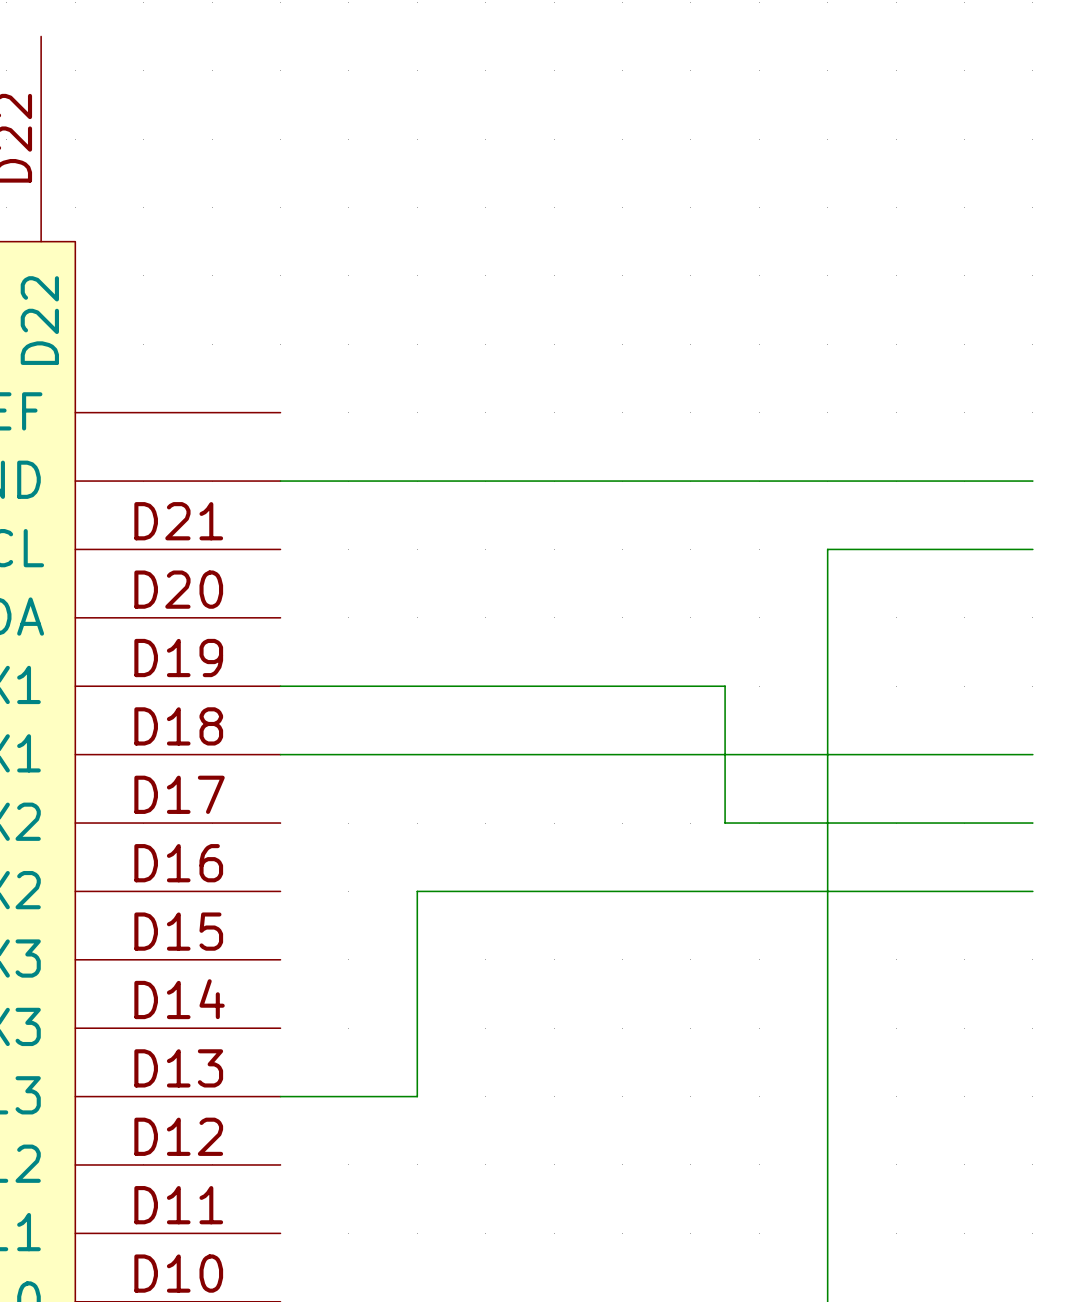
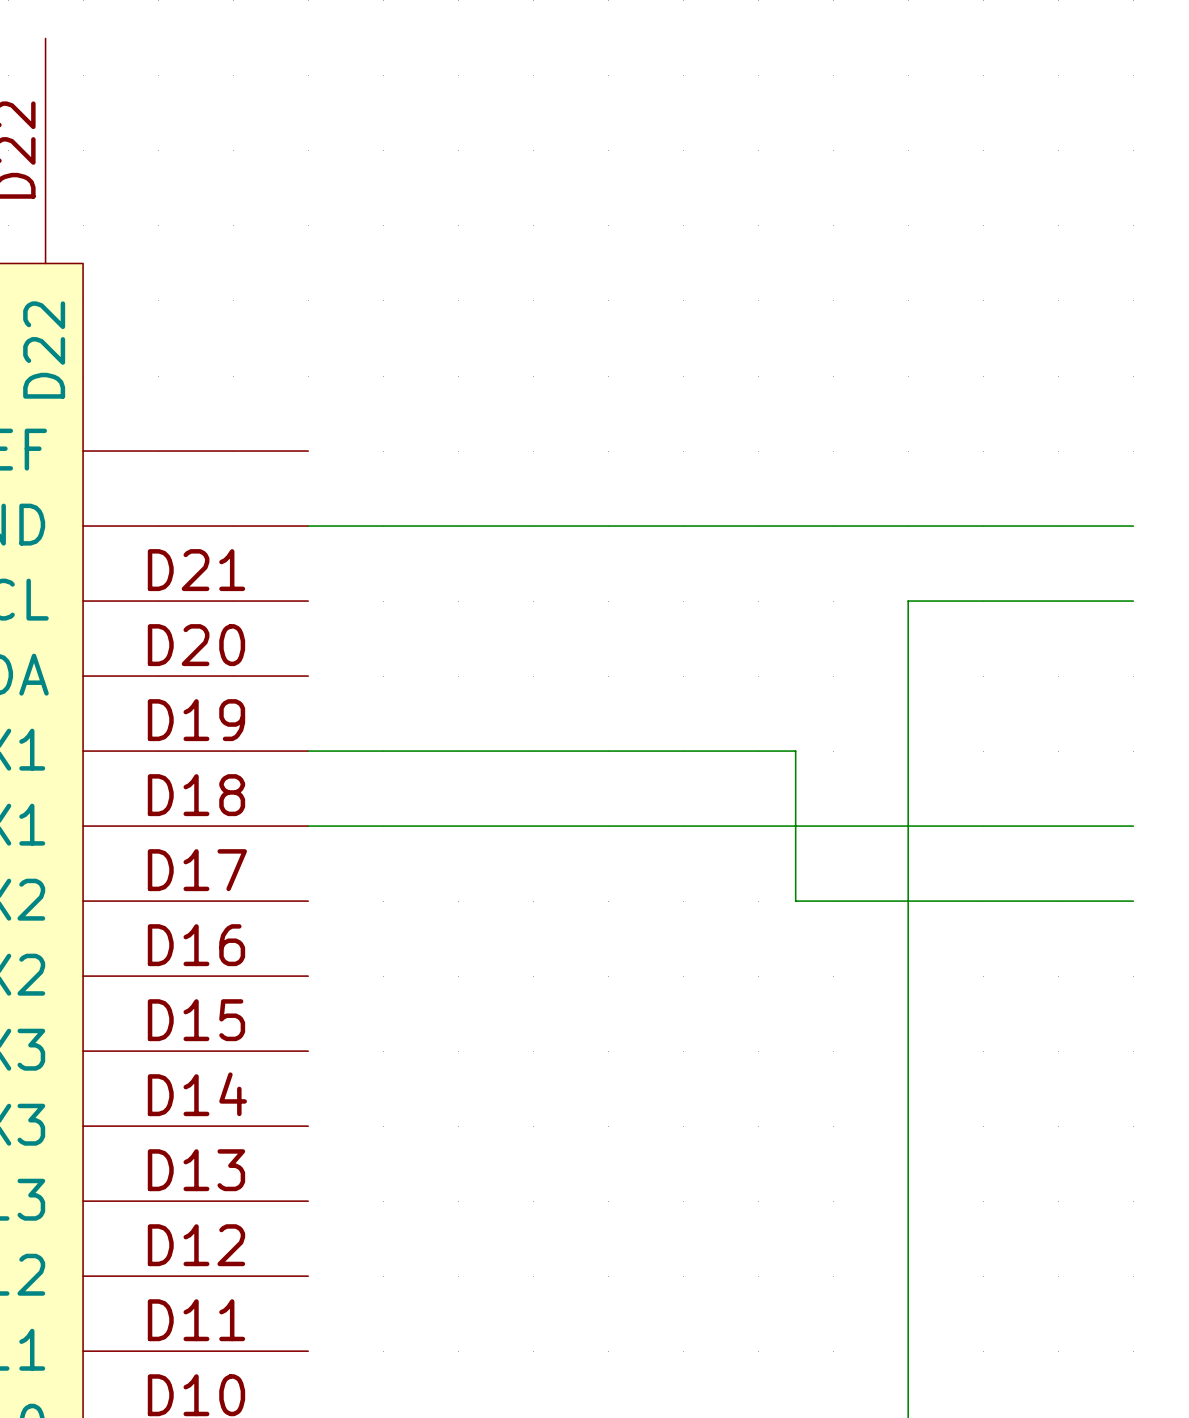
wire: (1032, 891) (417, 891) (417, 1096) (280, 1096) -> none

